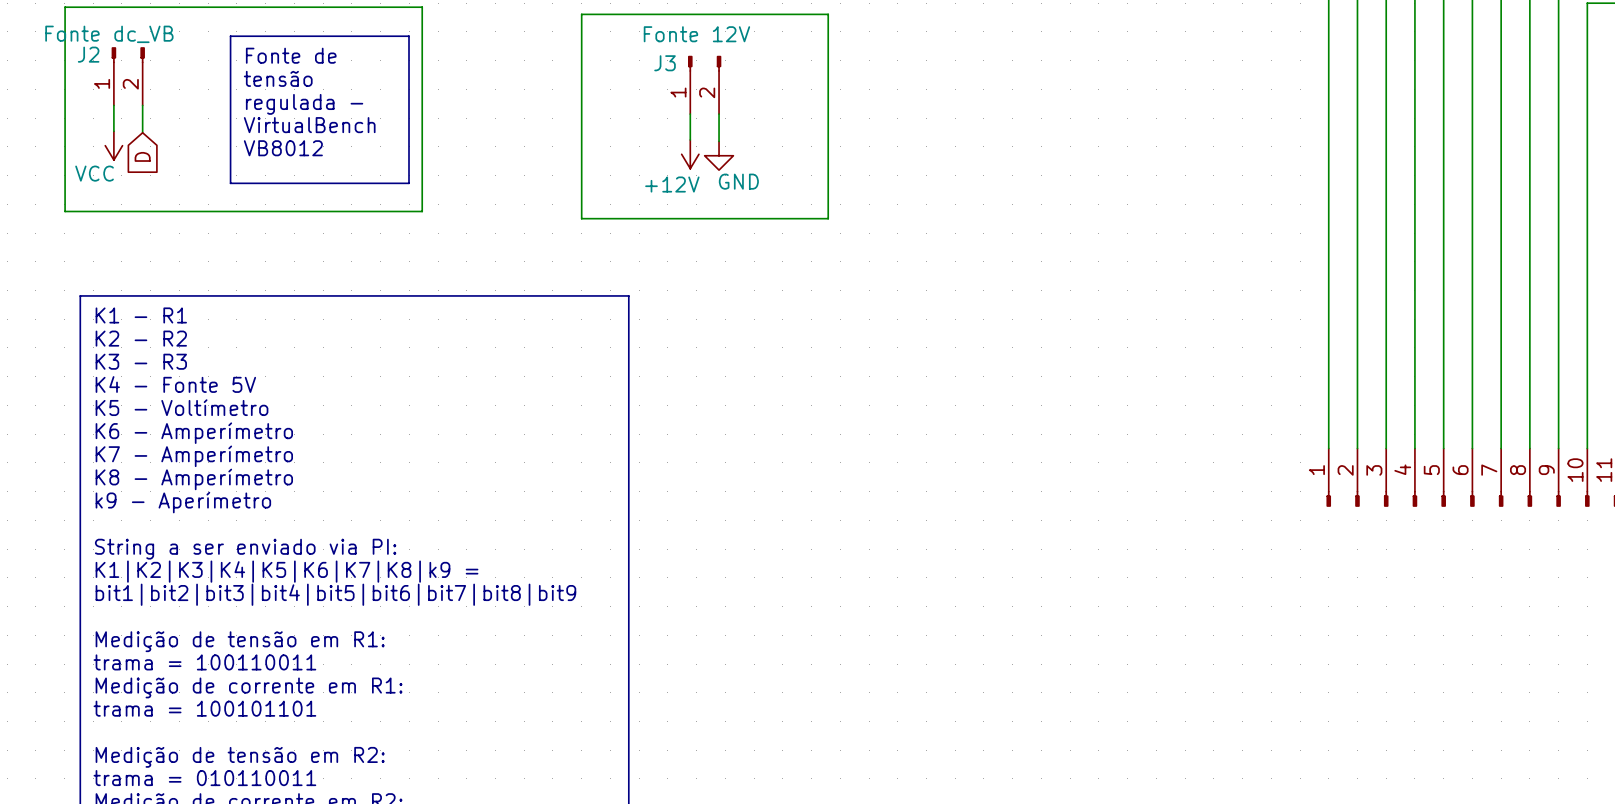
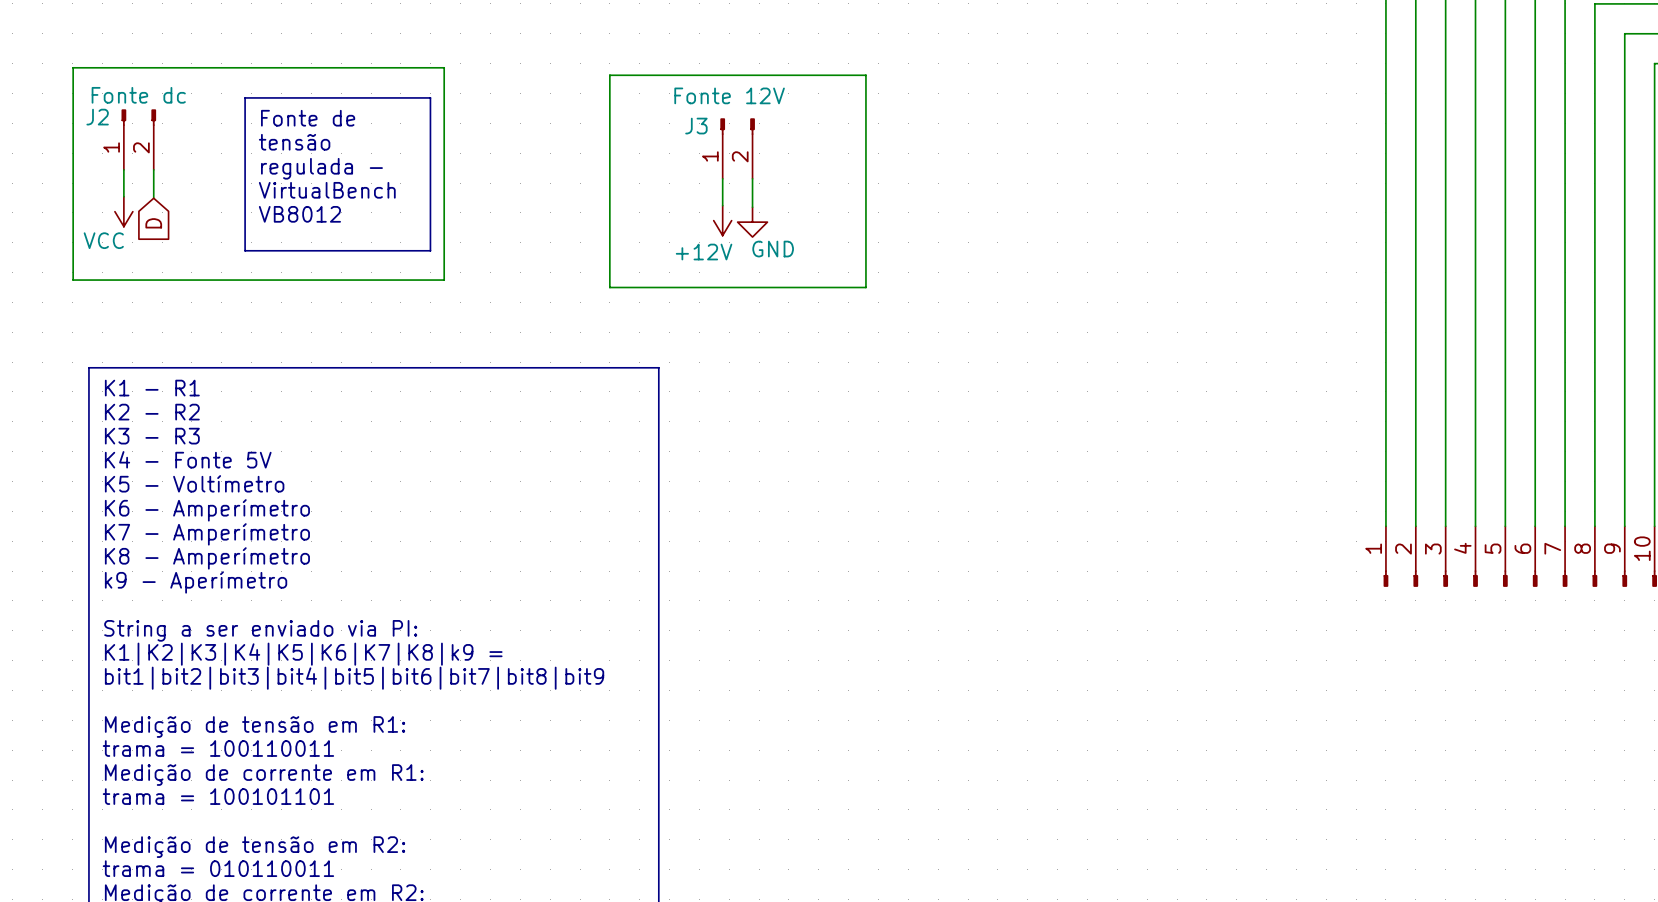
J2 value: Fonte dc_VB (109, 34) -> Fonte dc (138, 95)

